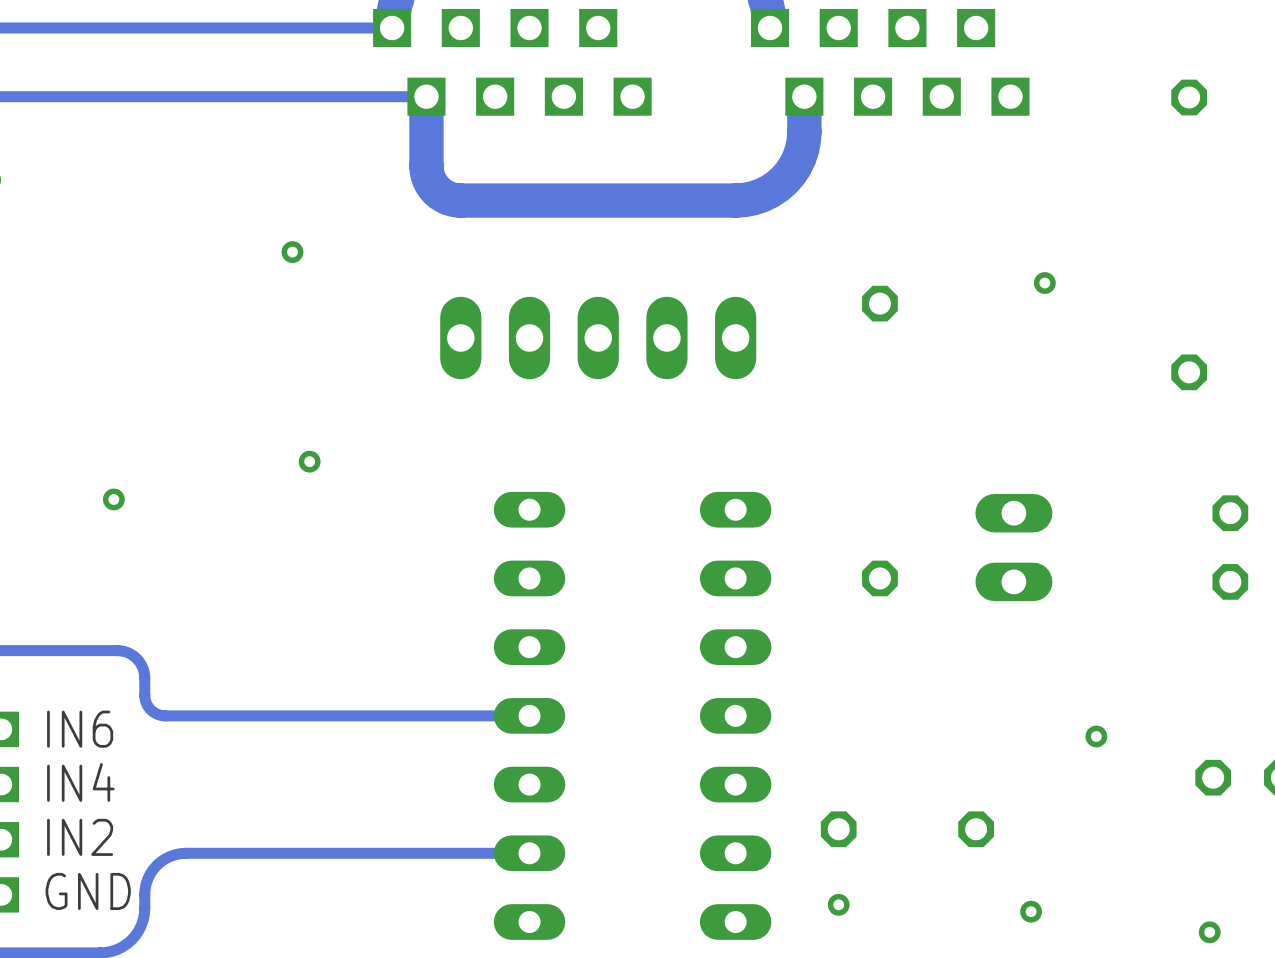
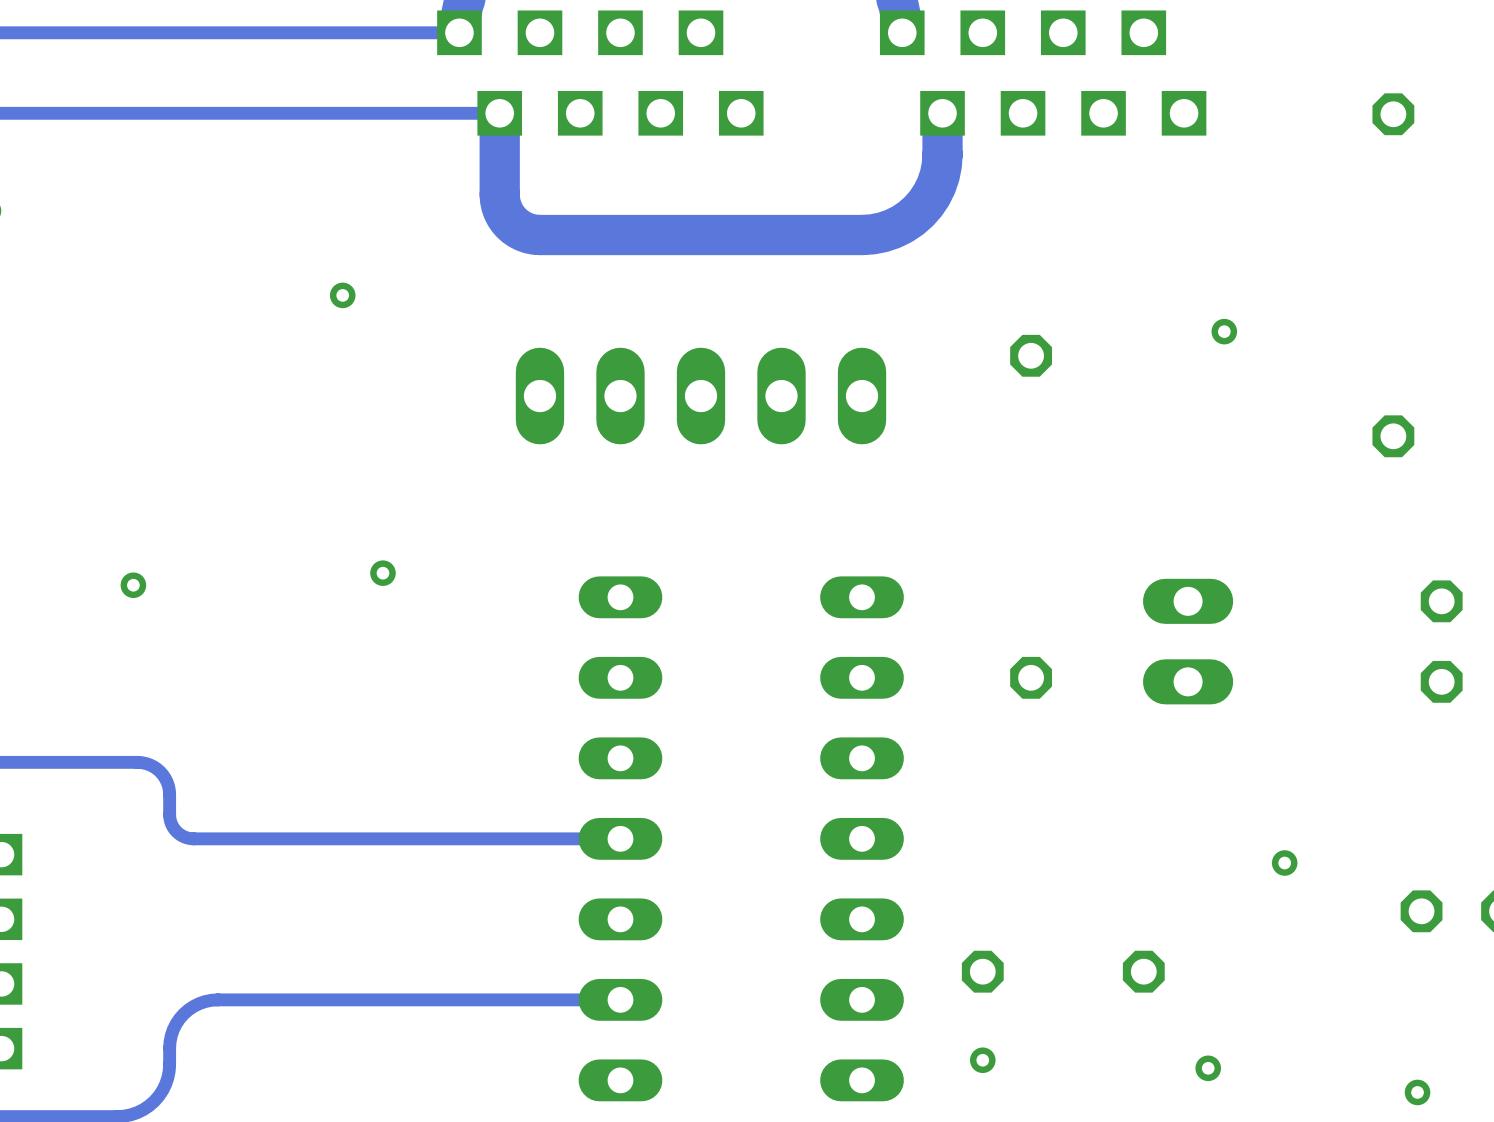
via position: (309, 461) -> (382, 573)
text: IN6 (80, 729) -> none
text: IN4 (80, 782) -> none
text: IN2 (80, 837) -> none
text: GND (88, 891) -> none

